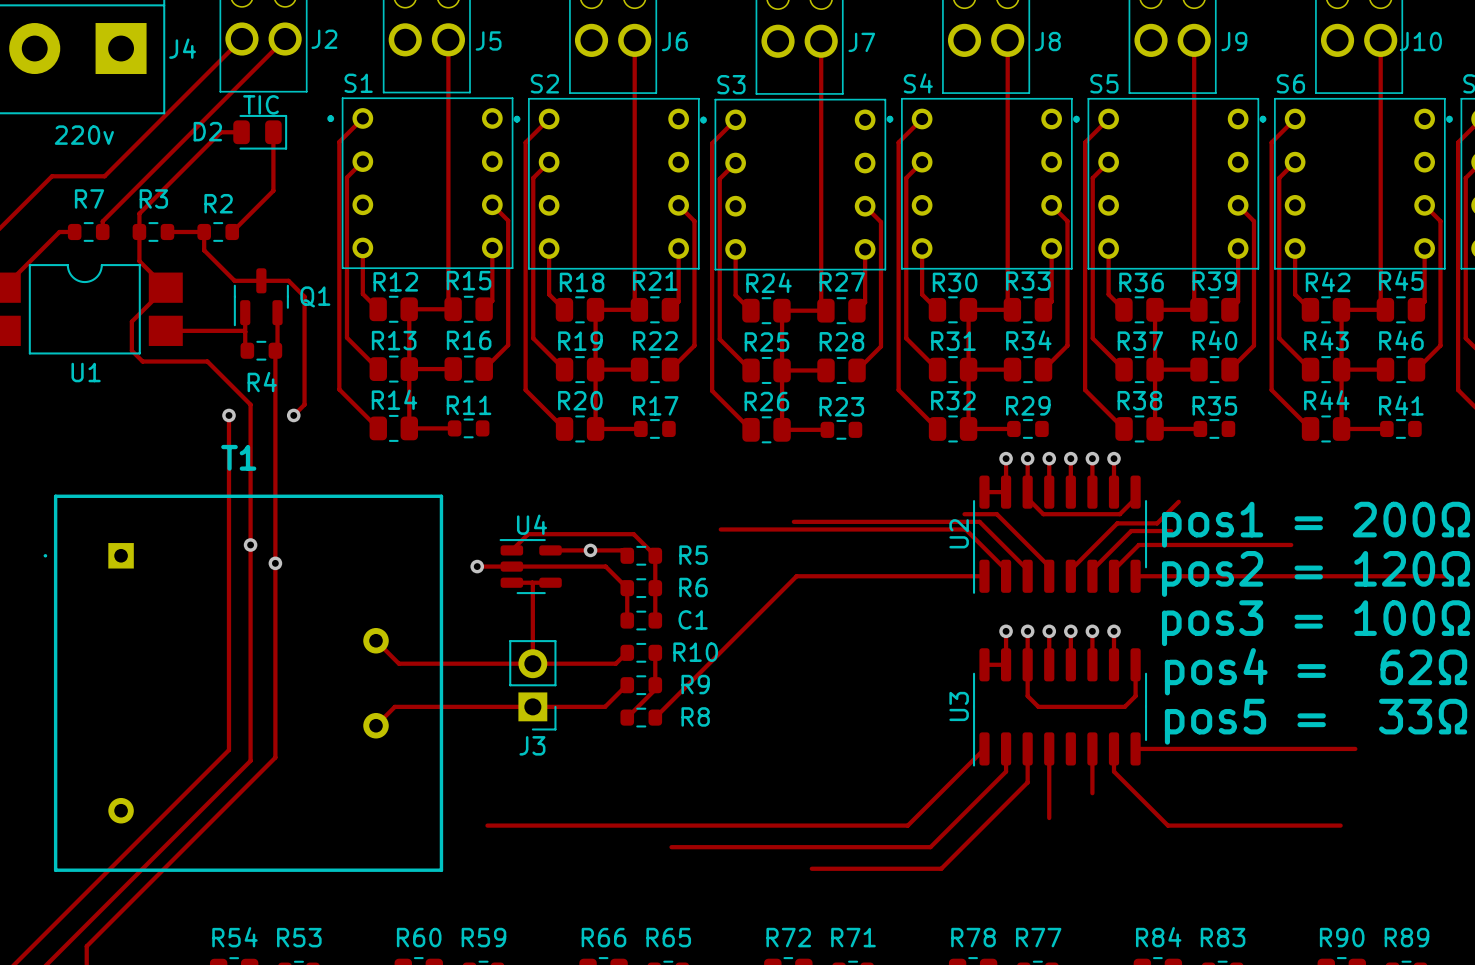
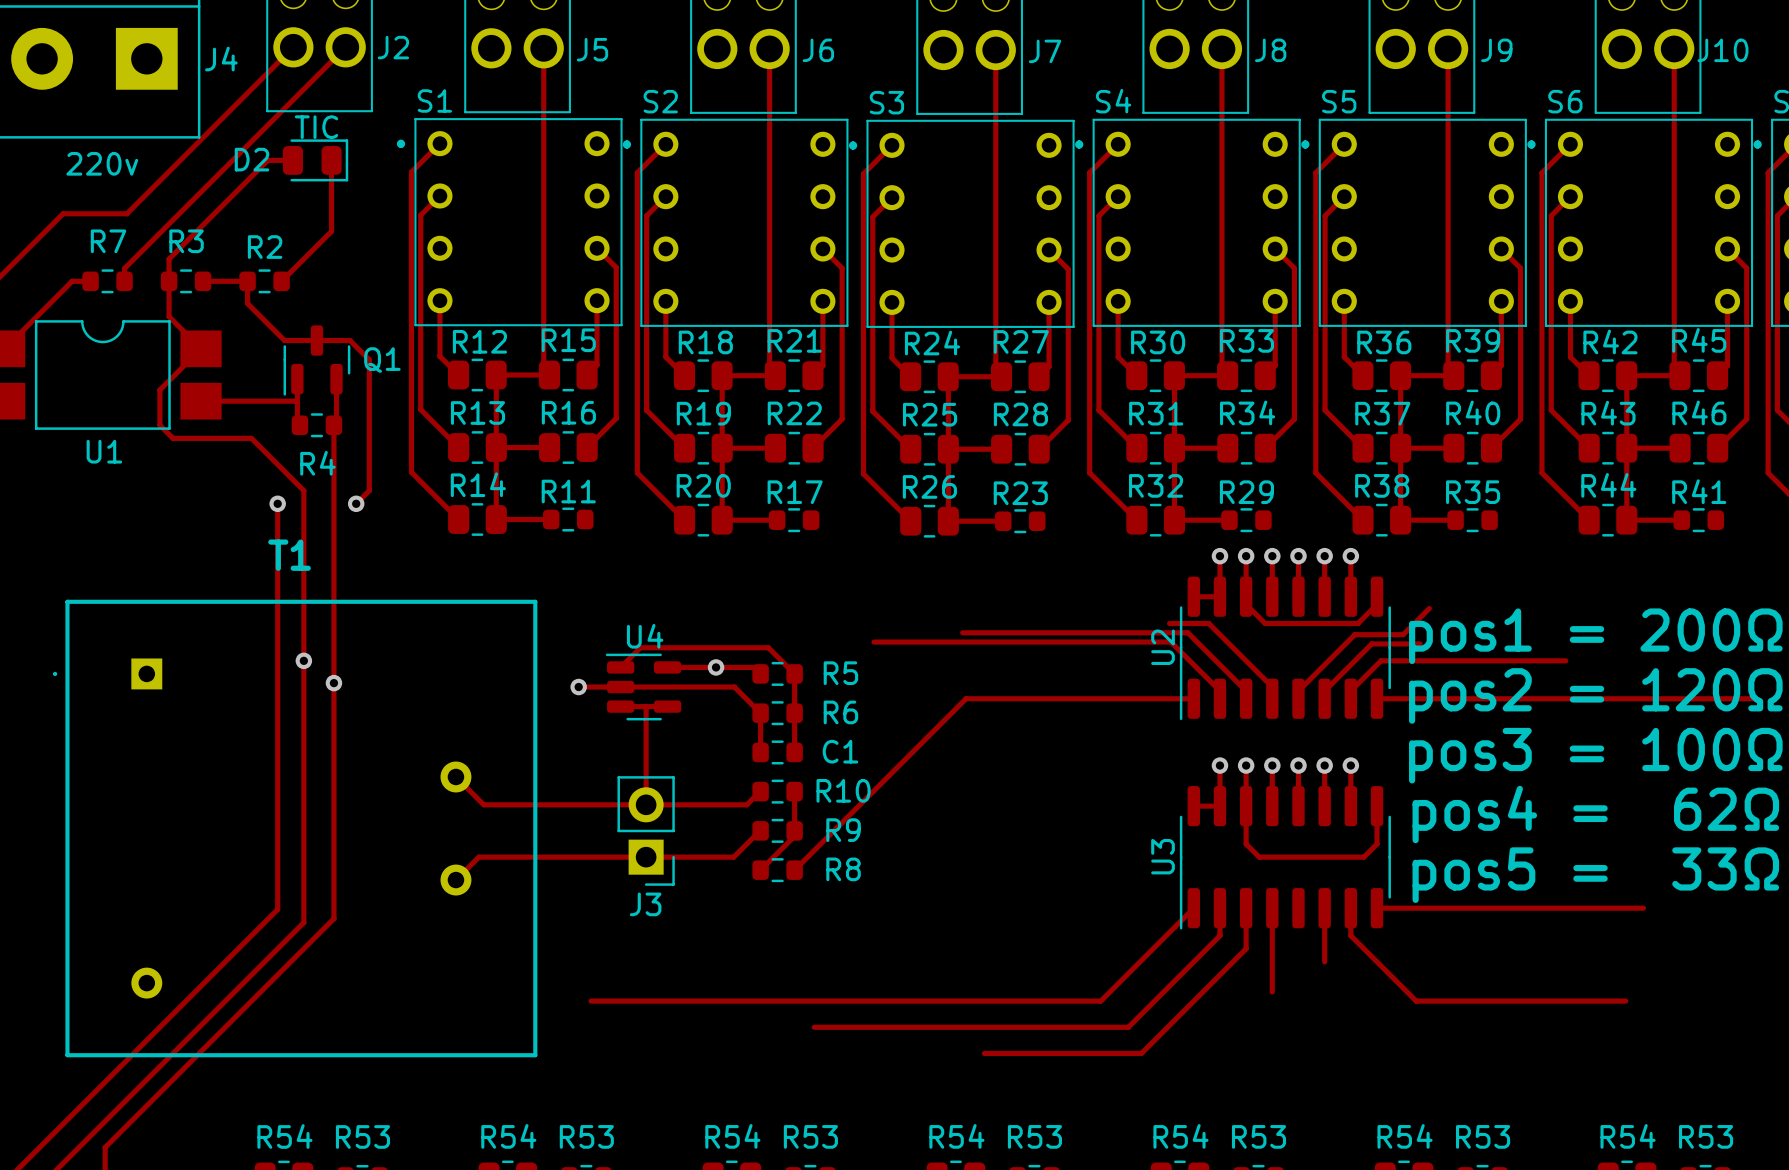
R60 name: R60 (419, 937) -> R54 (508, 1136)
R59 name: R59 (483, 937) -> R53 (586, 1136)
R66 name: R66 (603, 937) -> R54 (732, 1136)
R65 name: R65 (668, 937) -> R53 (810, 1136)
R72 name: R72 (788, 937) -> R54 (956, 1136)
R71 name: R71 (853, 937) -> R53 (1034, 1136)
R78 name: R78 (973, 937) -> R54 (1180, 1136)
R77 name: R77 (1038, 937) -> R53 (1259, 1136)
R84 name: R84 (1158, 937) -> R54 (1405, 1136)
R83 name: R83 (1223, 937) -> R53 (1483, 1136)
R90 name: R90 (1342, 937) -> R54 (1628, 1136)
R89 name: R89 (1406, 937) -> R53 (1706, 1136)

